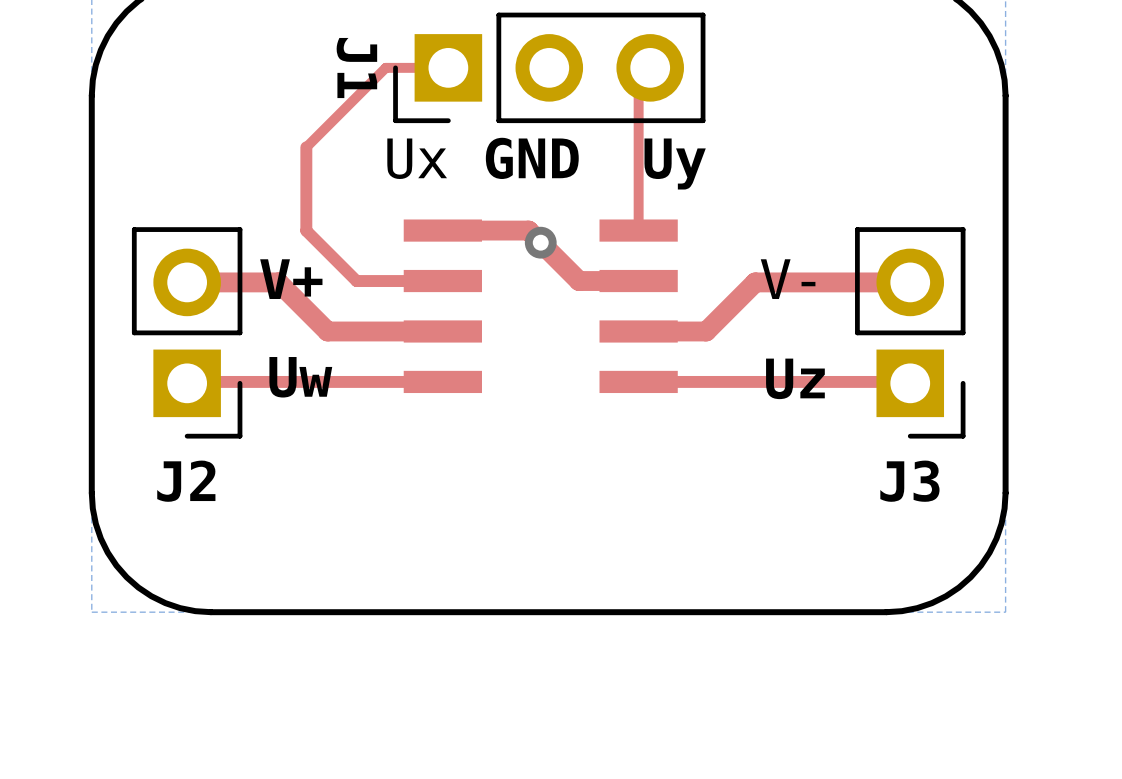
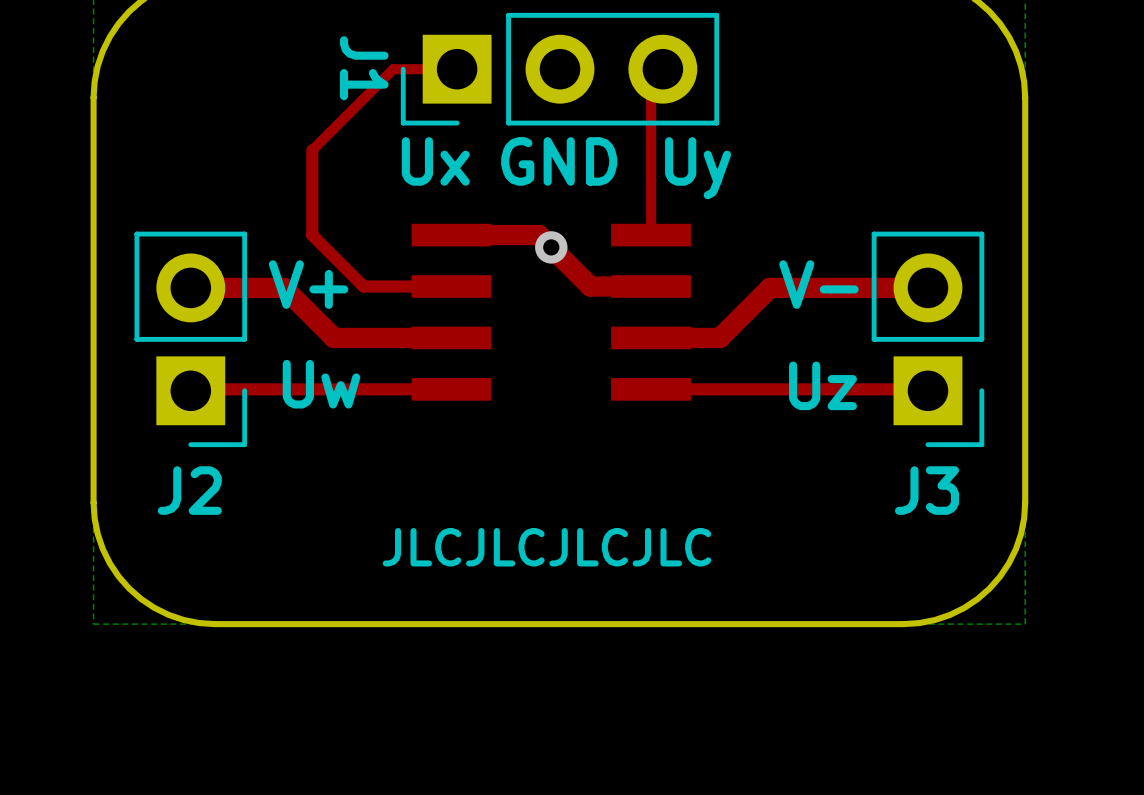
text: none -> JLCJLCJLCJLC (546, 547)

